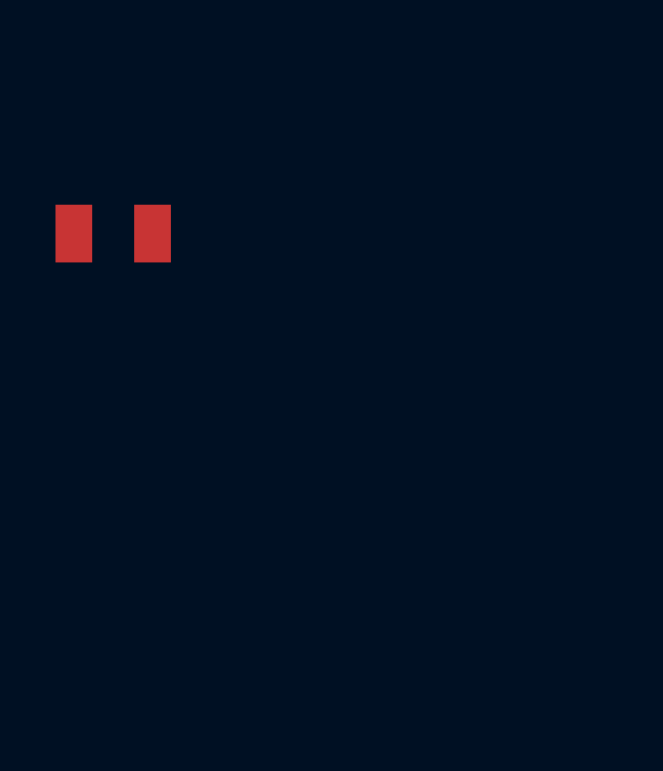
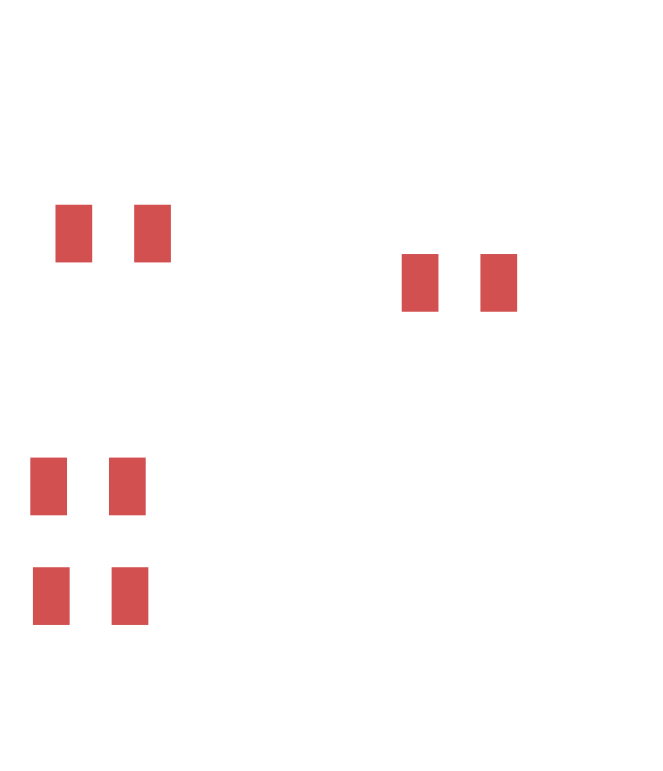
part: none -> (459, 282)
part: none -> (88, 486)
part: none -> (90, 596)

